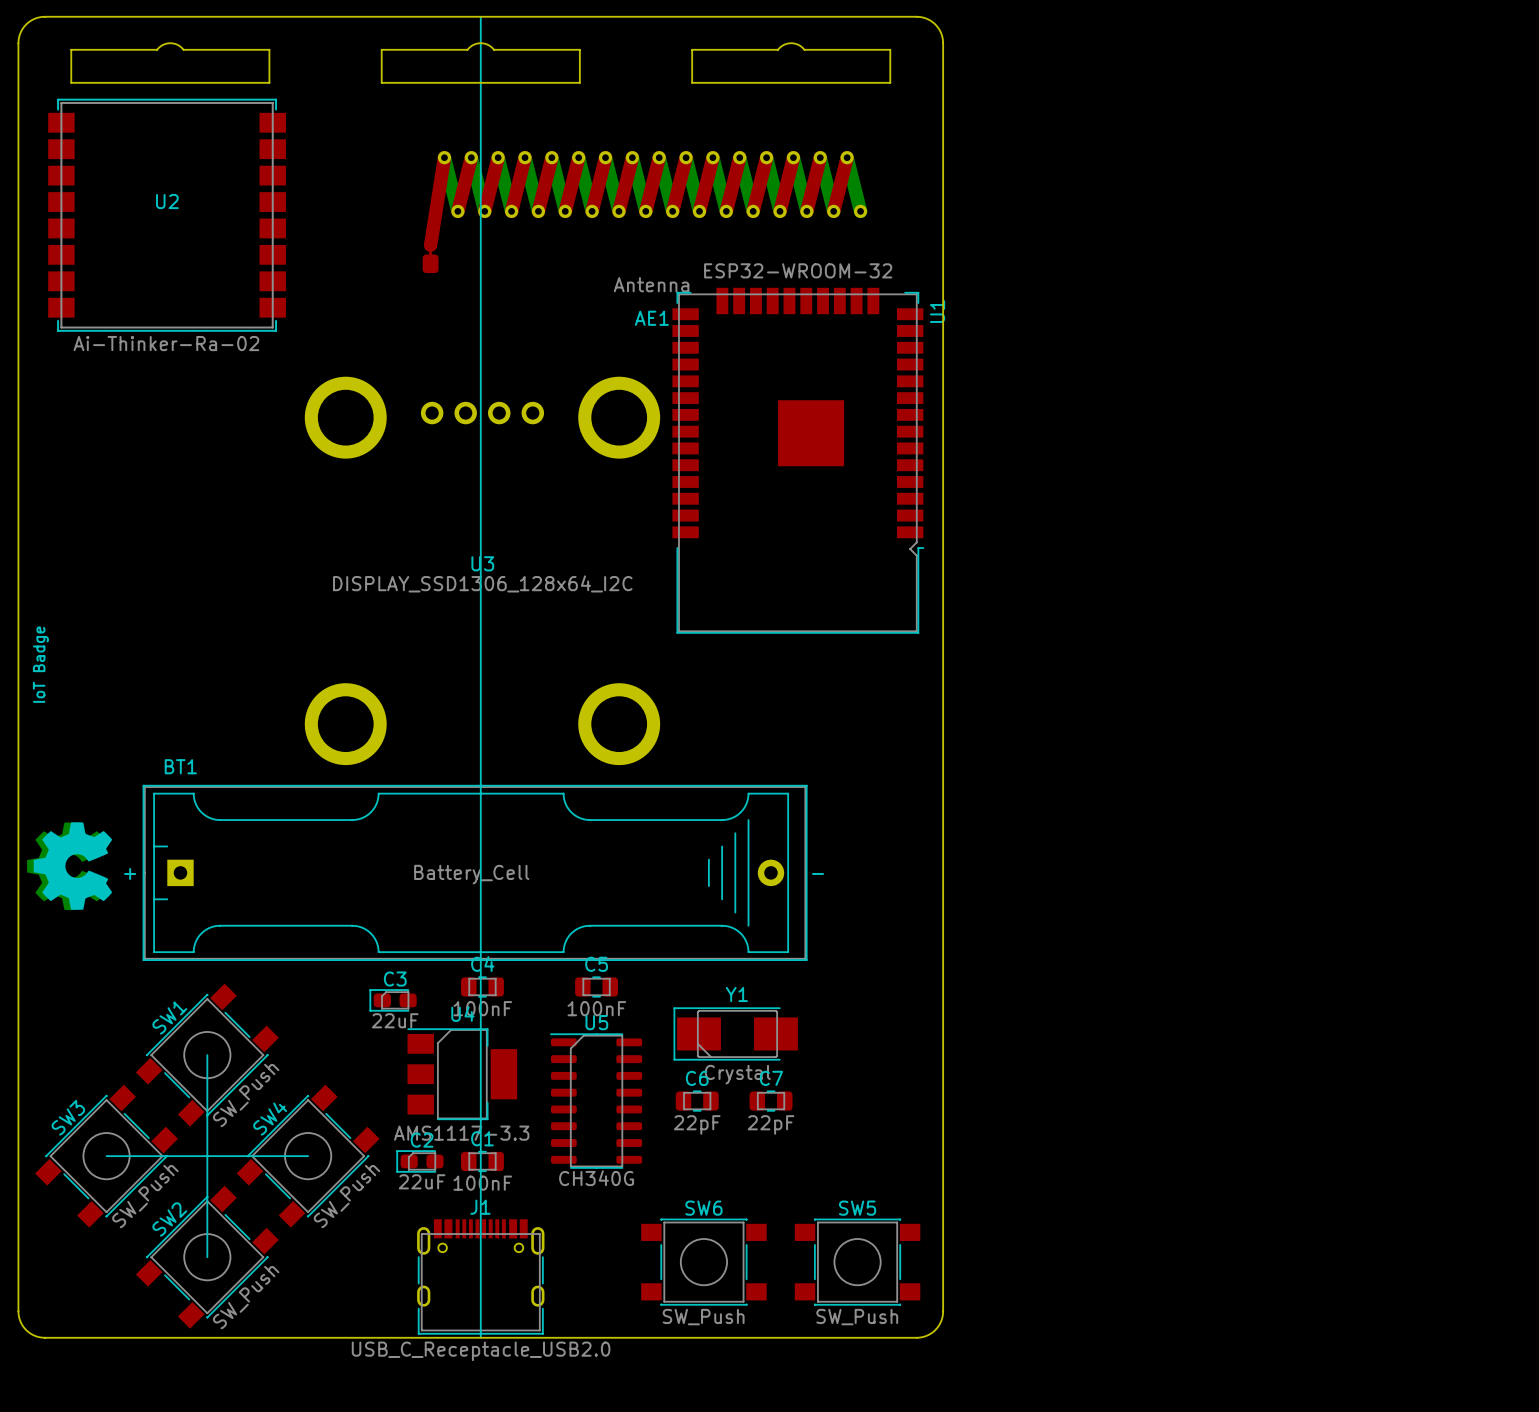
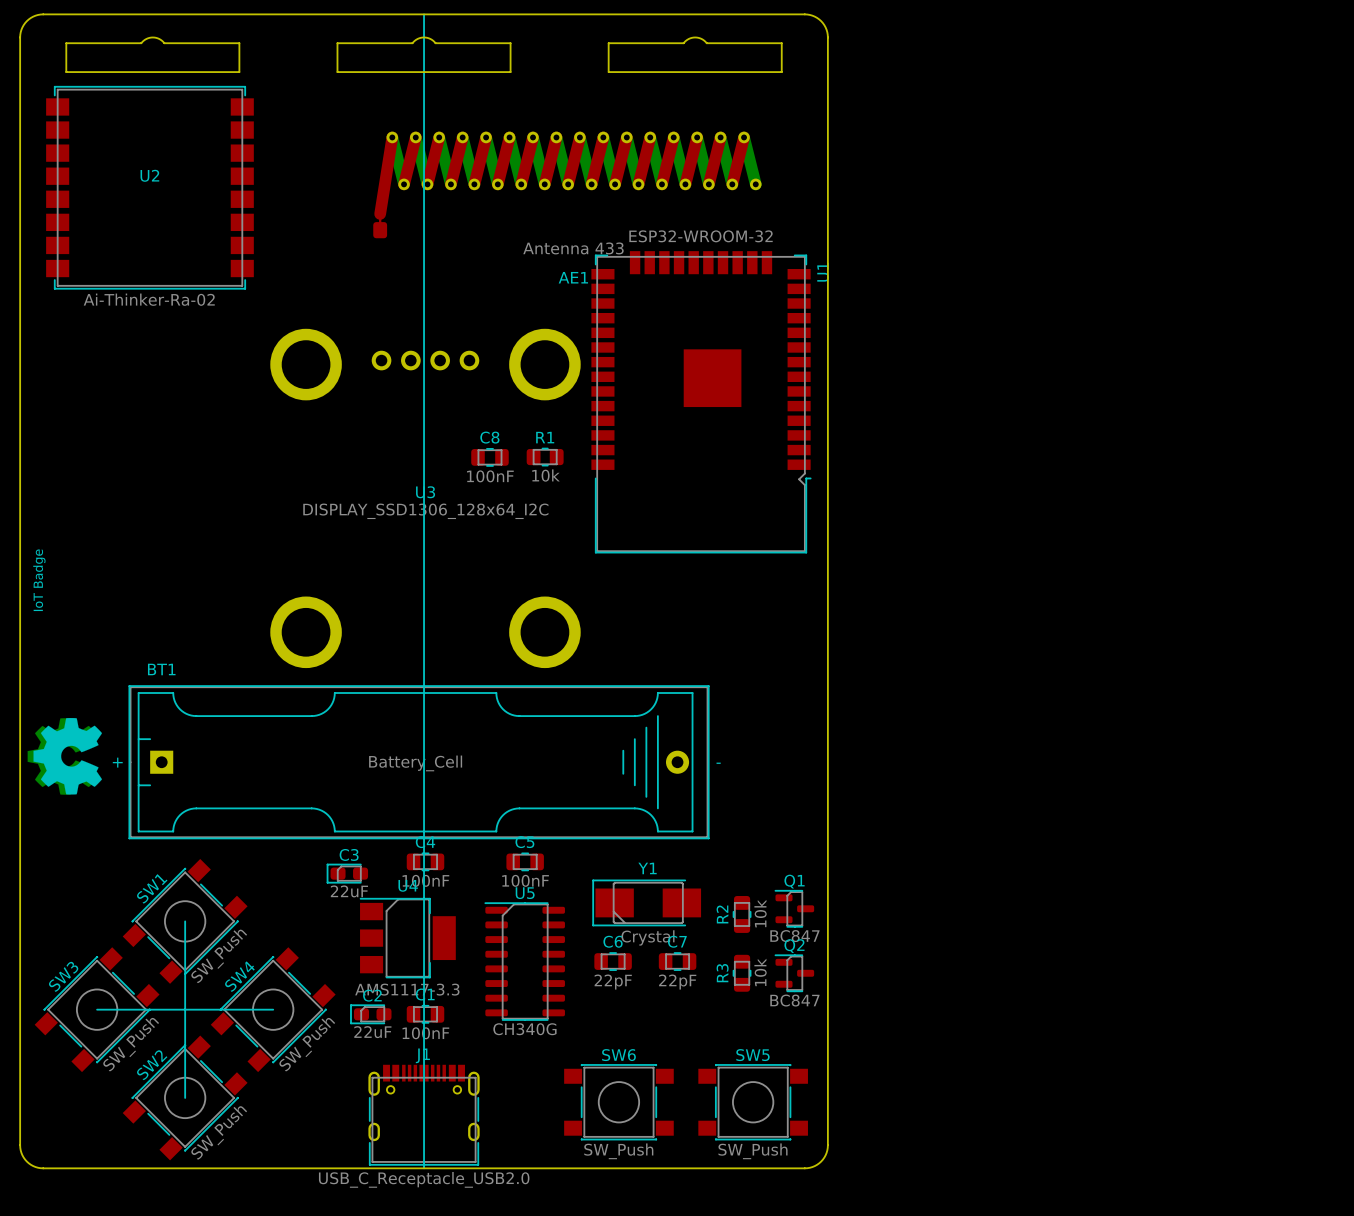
AE1 value: Antenna (651, 284) -> Antenna 433 (573, 248)
C8: none -> 100nF (489, 457)
R1: none -> 10k (545, 457)
Q1: none -> BC847 (794, 908)
R2: none -> 10k (742, 914)
R3: none -> 10k (742, 973)
Q2: none -> BC847 (794, 973)

